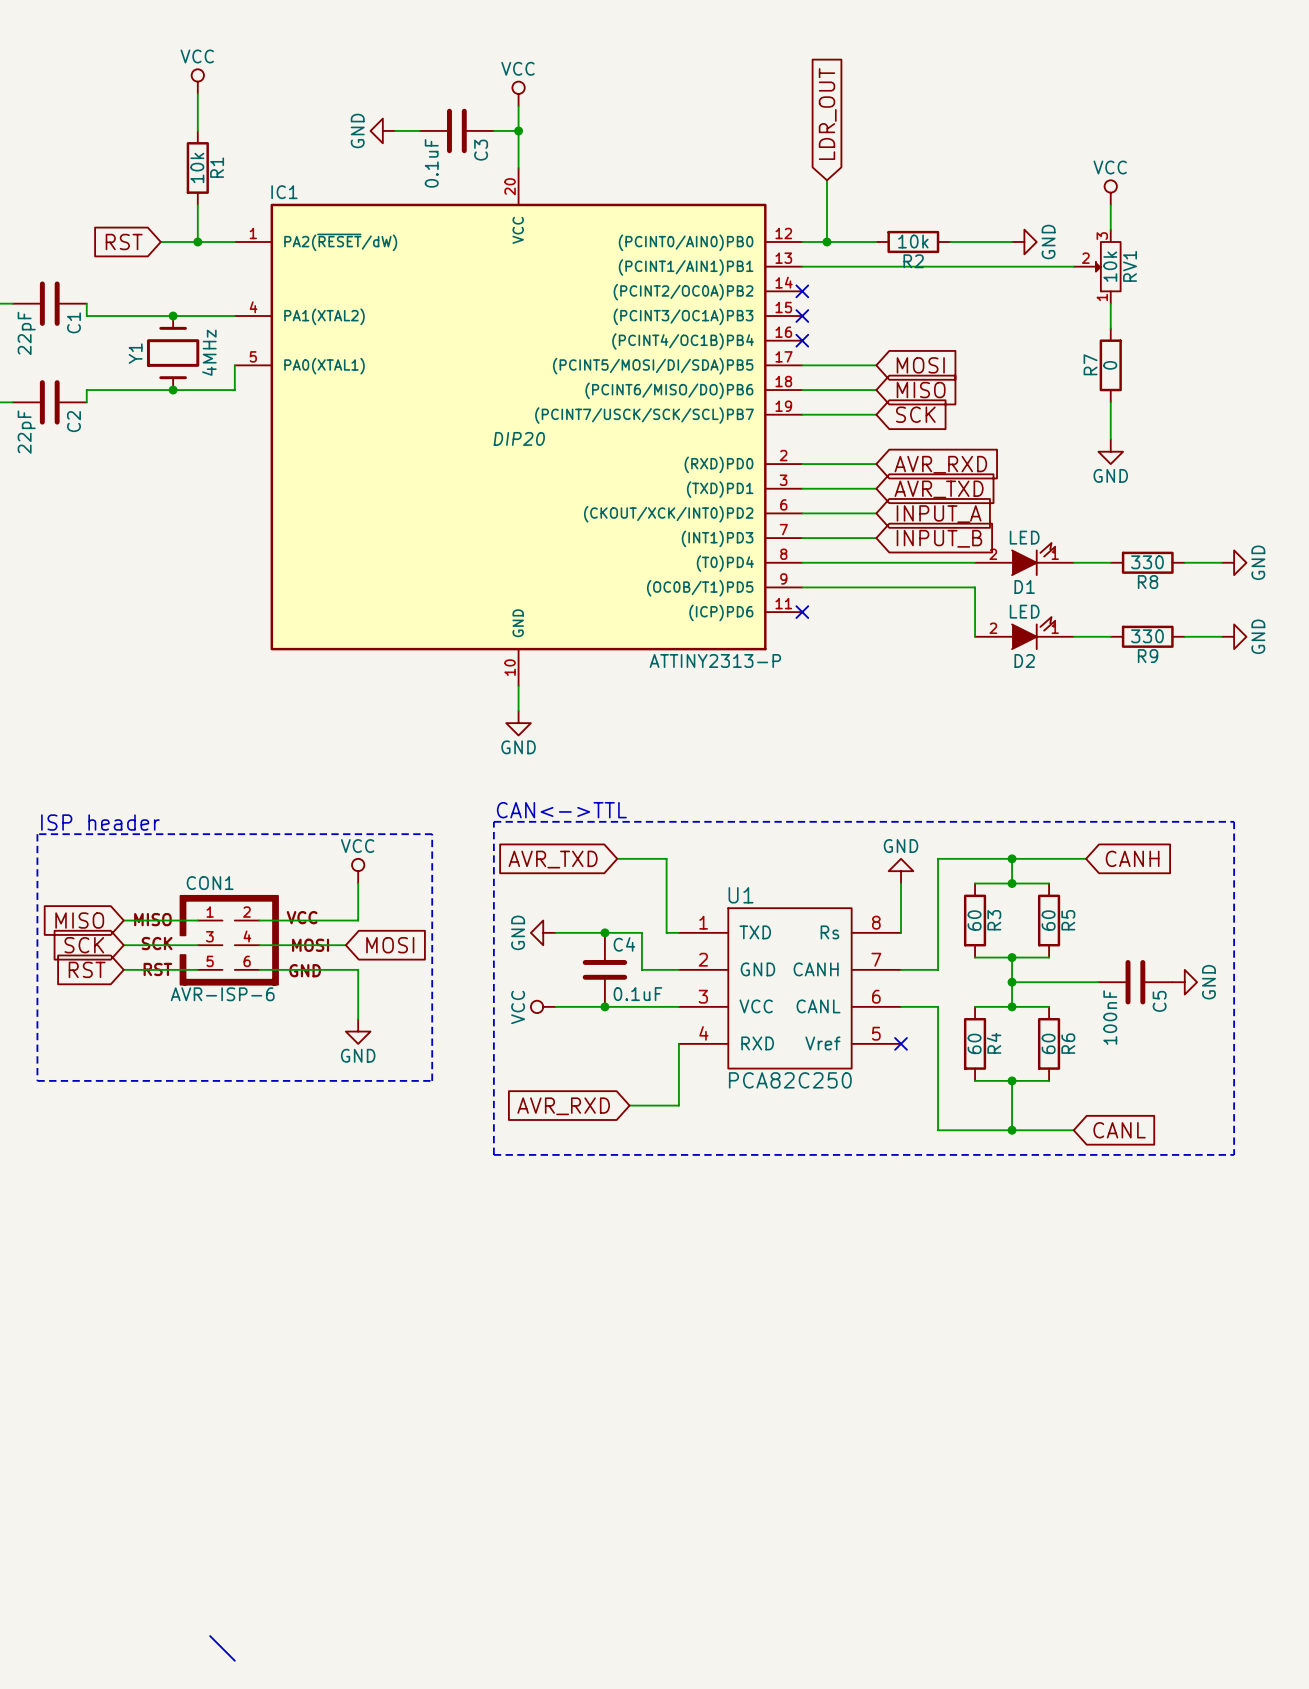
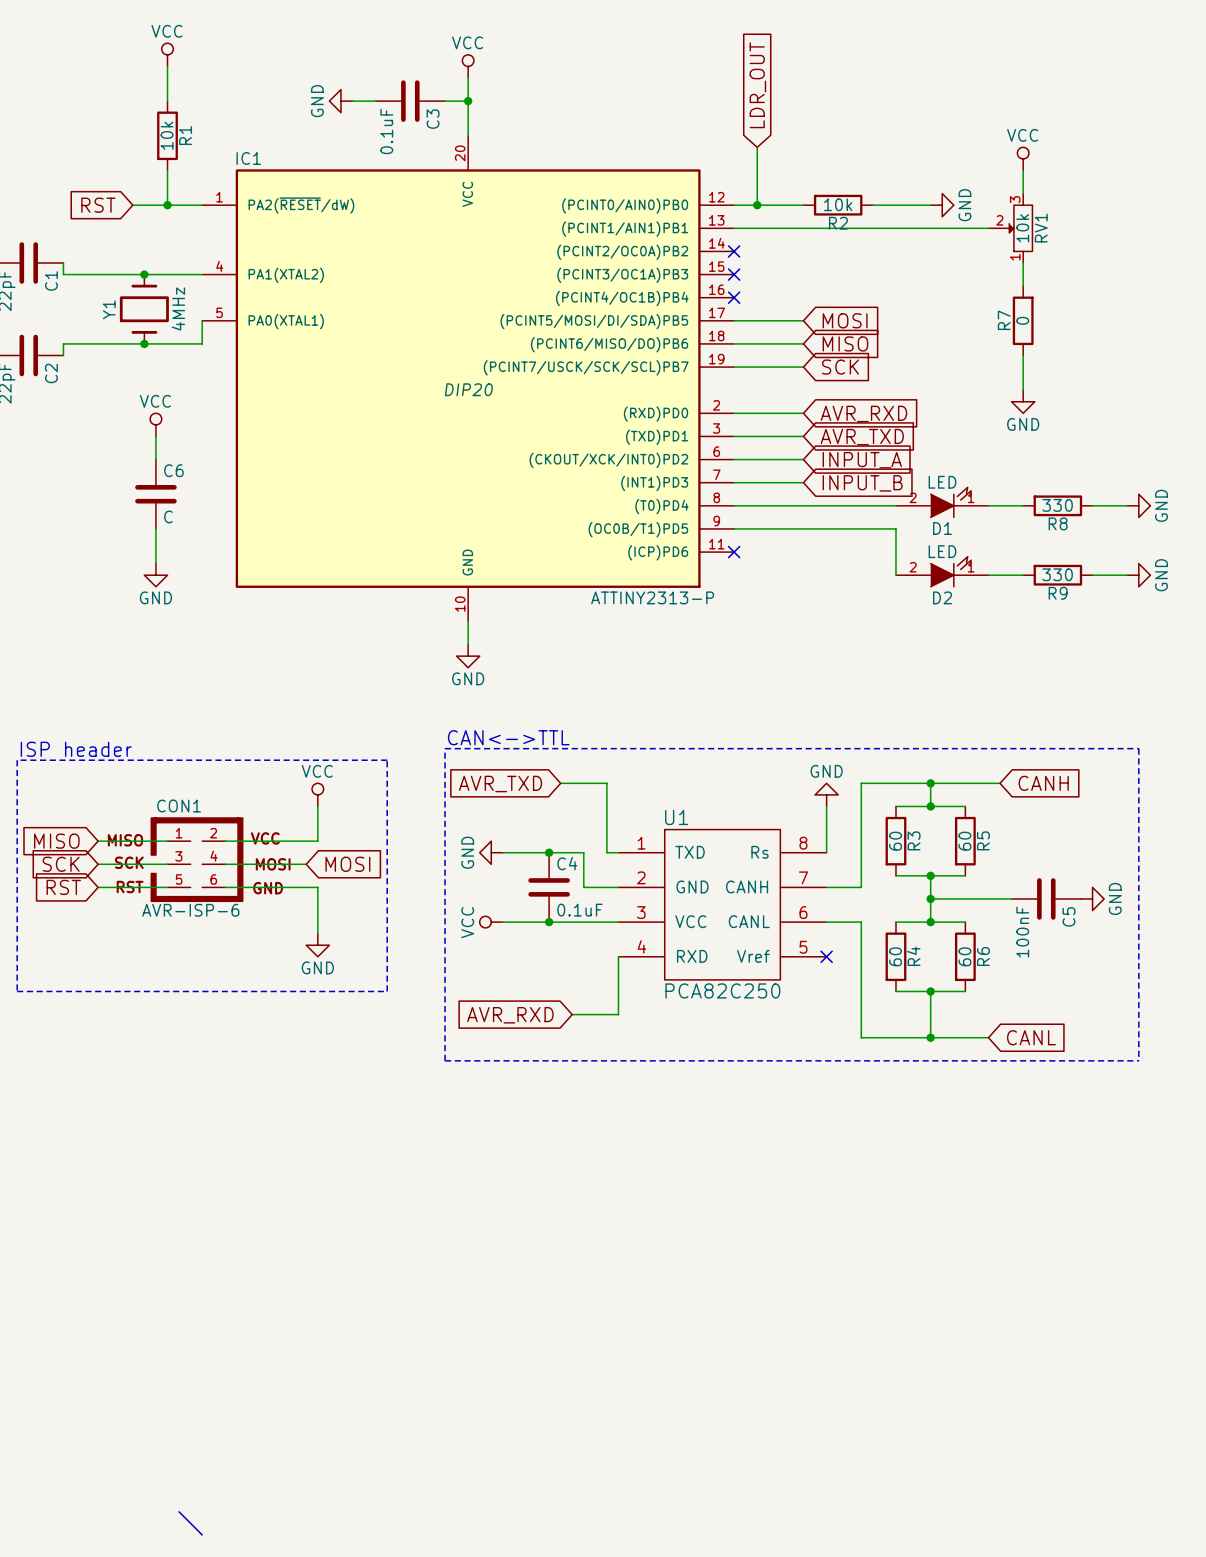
power symbol: none -> VCC (155, 424)
wire: none -> (155, 436) (155, 459)
C6: none -> C (155, 494)
wire: none -> (155, 528) (155, 563)
power symbol: none -> GND (155, 575)

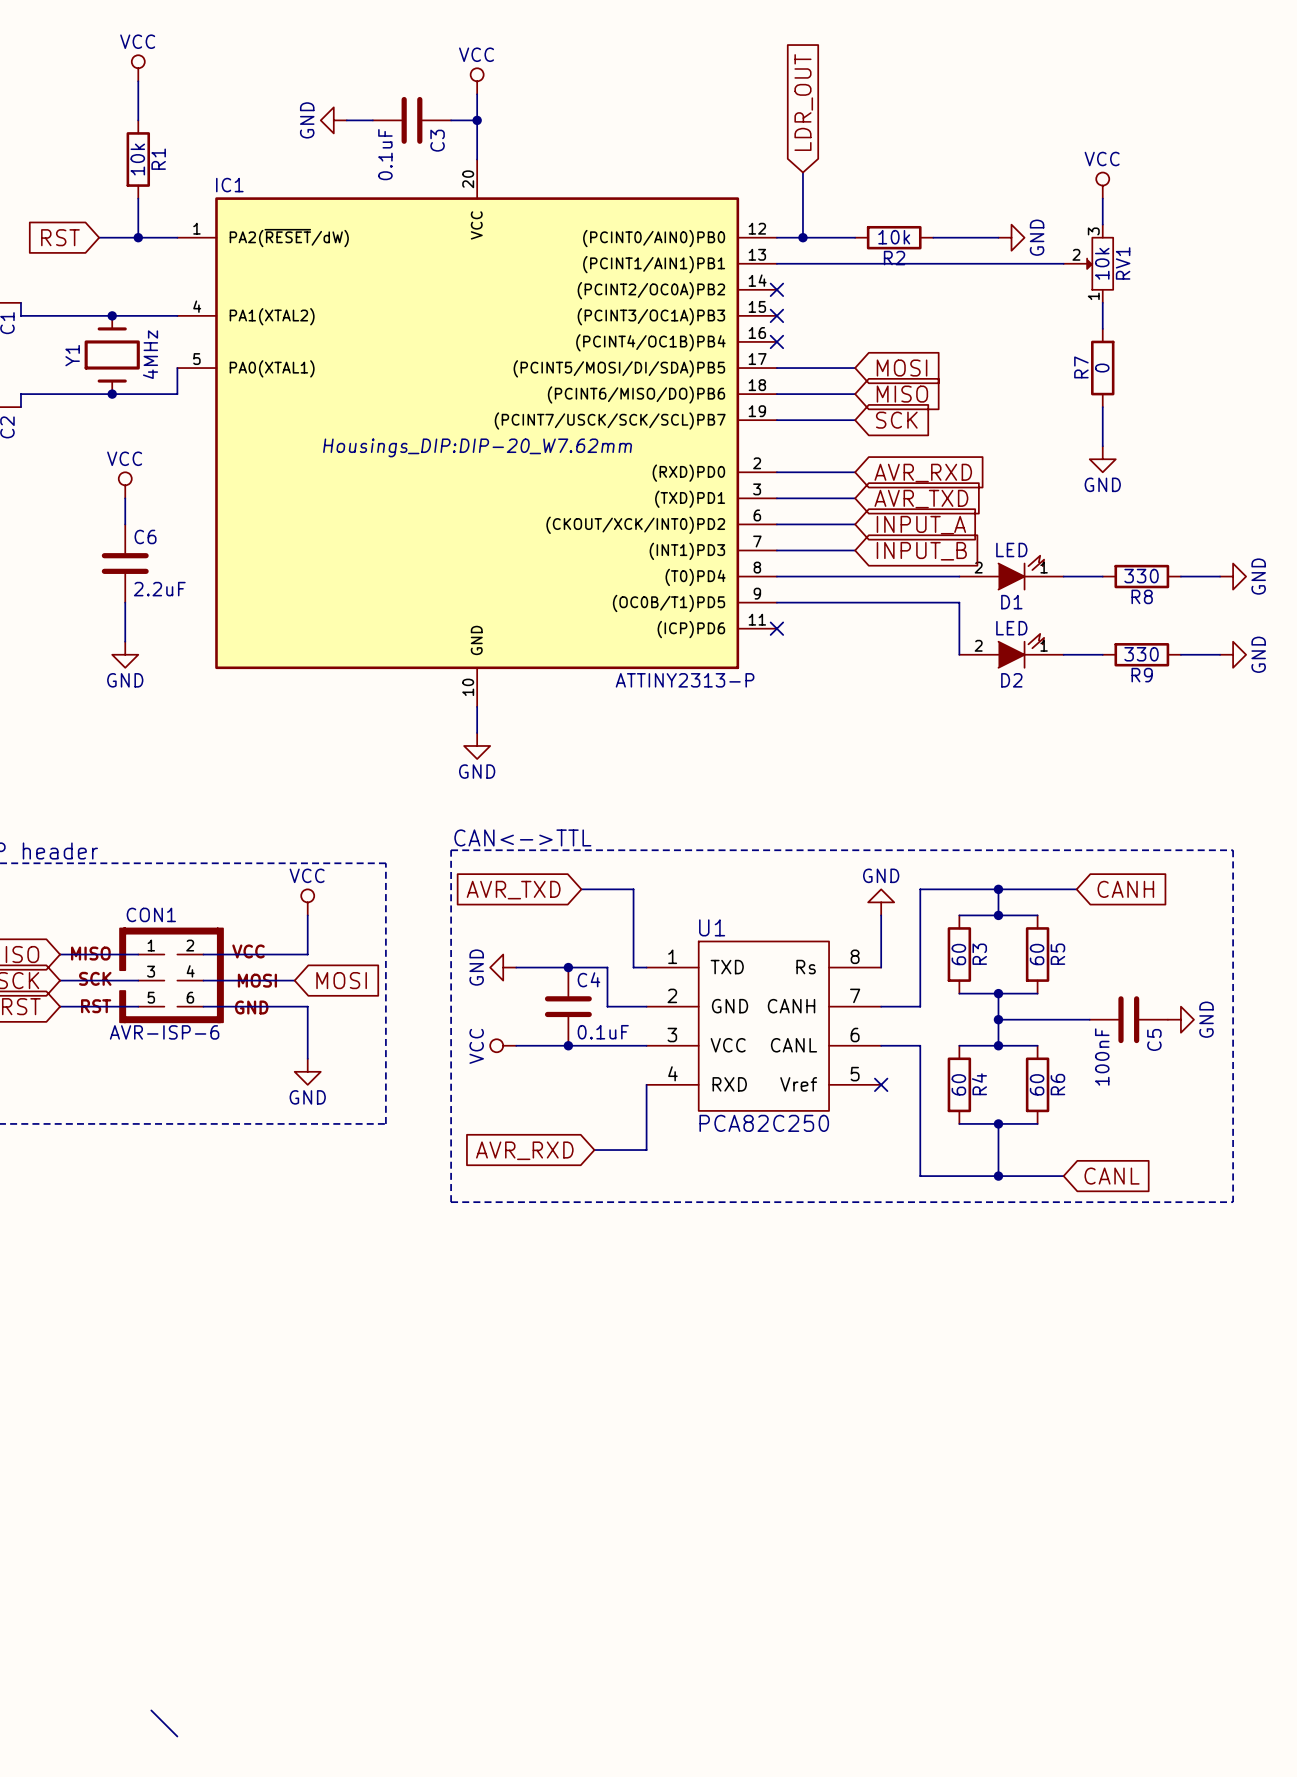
IC1 text: DIP20 (468, 389) -> Housings_DIP:DIP-20_W7.62mm (477, 447)
C6 value: C (168, 516) -> 2.2uF (159, 589)

